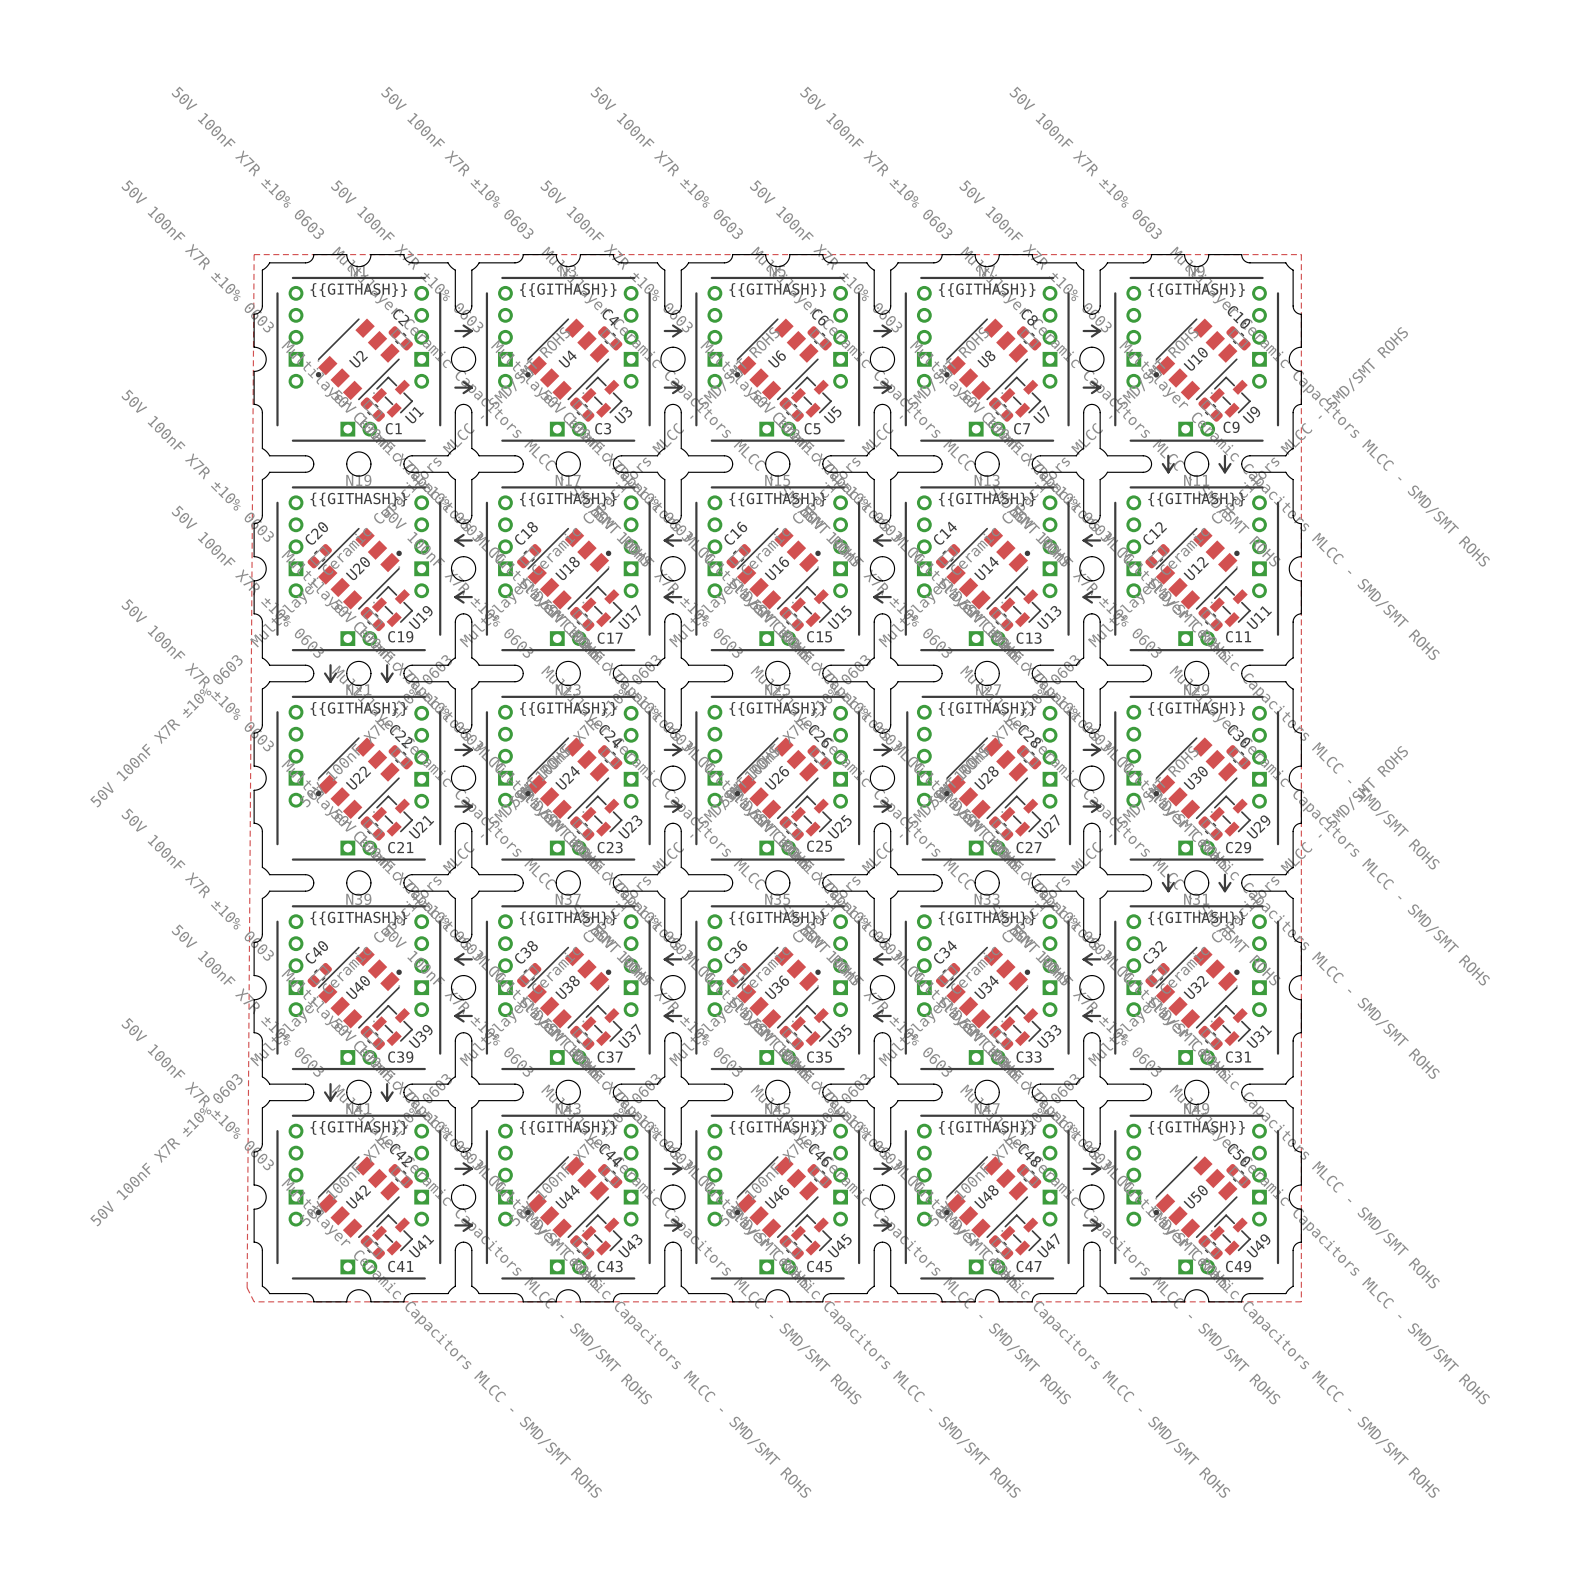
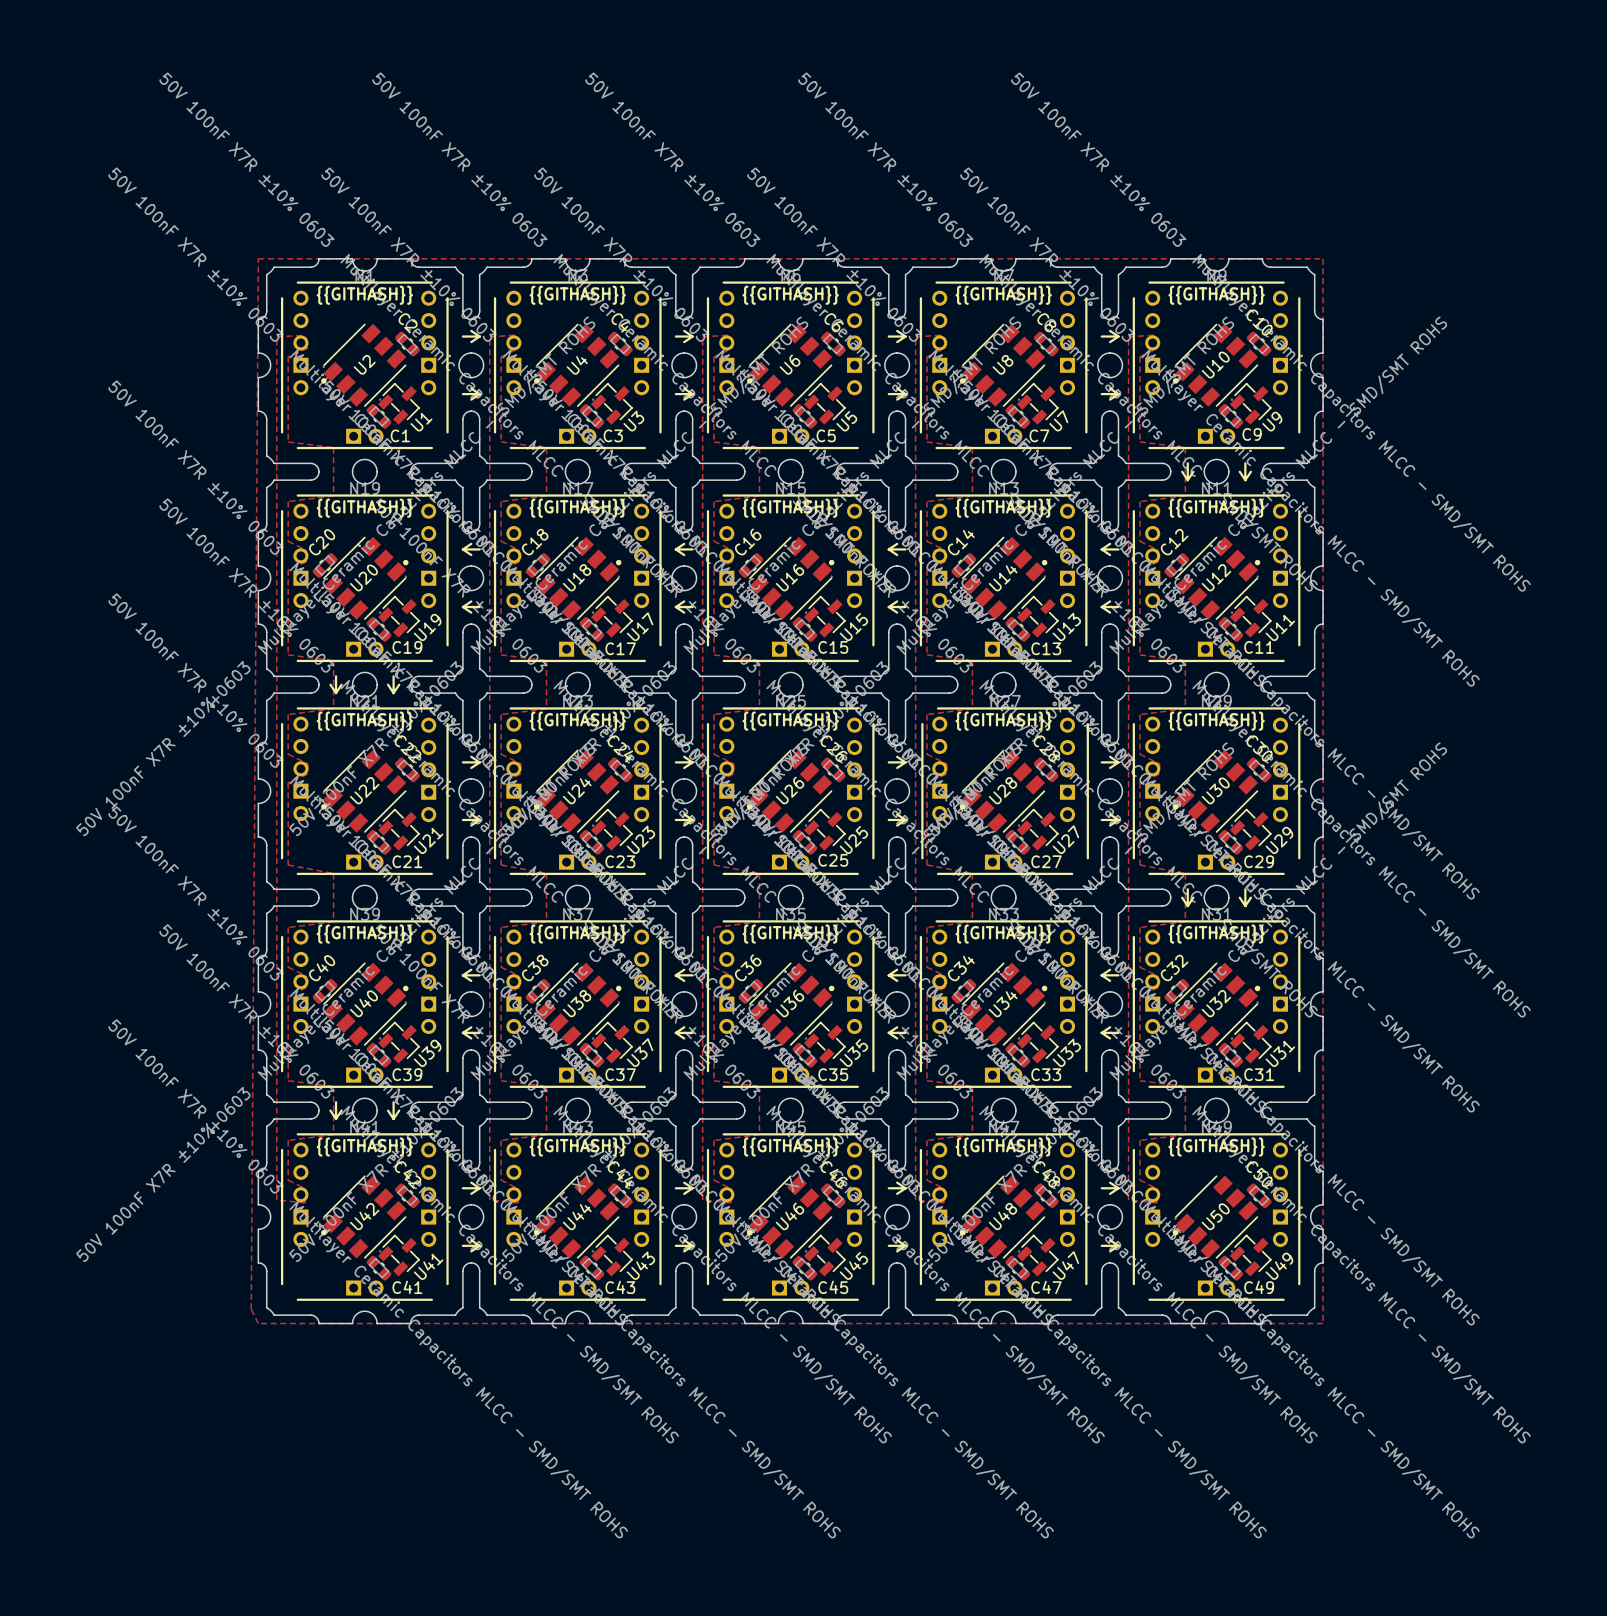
zone outline: none -> (300, 335) (276, 336) (276, 1200) (305, 1202) (305, 1188) (288, 1180) (288, 1140) (333, 1134) (333, 1086) (288, 1080) (288, 995) (306, 987) (305, 975) (288, 967) (288, 927) (333, 921) (333, 873) (288, 864) (288, 782) (307, 774) (308, 763) (288, 754) (288, 714) (333, 708) (333, 660) (288, 654) (288, 569) (306, 561) (305, 549) (288, 541) (288, 501) (333, 495) (333, 447) (288, 441) (288, 356) (307, 348) (300, 335)
zone outline: none -> (514, 335) (489, 336) (489, 1200) (518, 1202) (518, 1188) (501, 1180) (501, 1140) (546, 1134) (546, 1086) (501, 1080) (501, 995) (519, 987) (518, 975) (501, 967) (501, 927) (546, 921) (546, 873) (501, 864) (501, 782) (520, 774) (520, 763) (501, 754) (501, 714) (546, 708) (546, 660) (501, 654) (501, 569) (519, 561) (518, 549) (501, 541) (501, 501) (546, 495) (546, 447) (501, 441) (501, 356) (514, 350) (514, 335)
zone outline: none -> (727, 335) (702, 336) (702, 1200) (731, 1202) (731, 1188) (714, 1180) (714, 1140) (759, 1134) (759, 1086) (714, 1080) (714, 995) (732, 987) (731, 975) (714, 967) (714, 927) (759, 921) (759, 873) (714, 864) (714, 782) (733, 774) (733, 763) (714, 754) (714, 714) (759, 708) (759, 660) (714, 654) (714, 569) (732, 561) (731, 549) (714, 541) (714, 501) (759, 495) (759, 447) (714, 441) (714, 356) (727, 350) (727, 335)
zone outline: none -> (940, 335) (915, 336) (915, 1200) (944, 1202) (944, 1188) (926, 1180) (926, 1140) (972, 1134) (972, 1086) (926, 1080) (926, 995) (945, 987) (944, 975) (926, 967) (926, 927) (972, 921) (972, 873) (926, 864) (926, 782) (946, 774) (946, 763) (926, 754) (926, 714) (972, 708) (972, 660) (926, 654) (926, 569) (945, 561) (944, 549) (926, 541) (926, 501) (972, 495) (972, 447) (926, 441) (926, 356) (940, 350) (940, 335)
zone outline: none -> (1153, 335) (1128, 336) (1128, 1200) (1156, 1202) (1156, 1188) (1139, 1180) (1139, 1140) (1185, 1134) (1185, 1086) (1139, 1080) (1139, 995) (1158, 987) (1157, 975) (1139, 967) (1139, 927) (1185, 921) (1185, 873) (1139, 864) (1139, 782) (1159, 774) (1159, 763) (1139, 754) (1139, 714) (1185, 708) (1185, 660) (1139, 654) (1139, 569) (1158, 561) (1157, 549) (1139, 541) (1139, 501) (1185, 495) (1185, 447) (1139, 441) (1139, 356) (1152, 350) (1153, 335)

